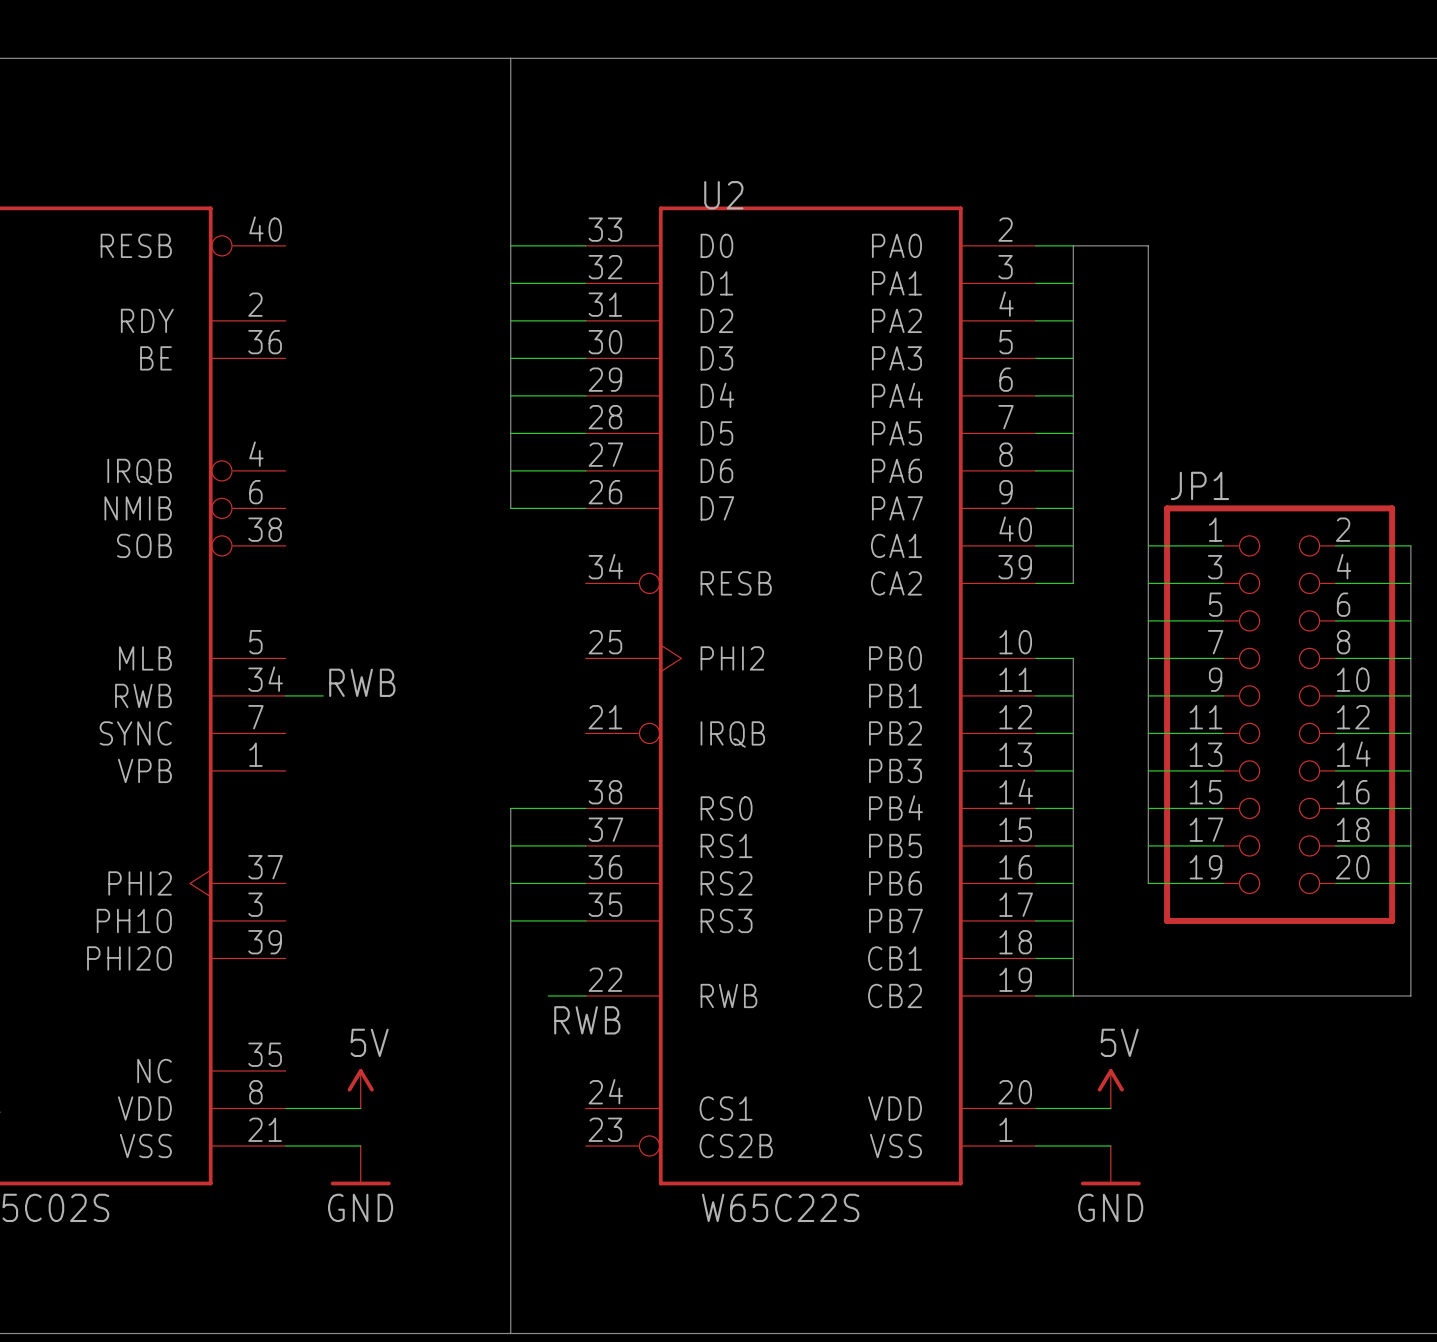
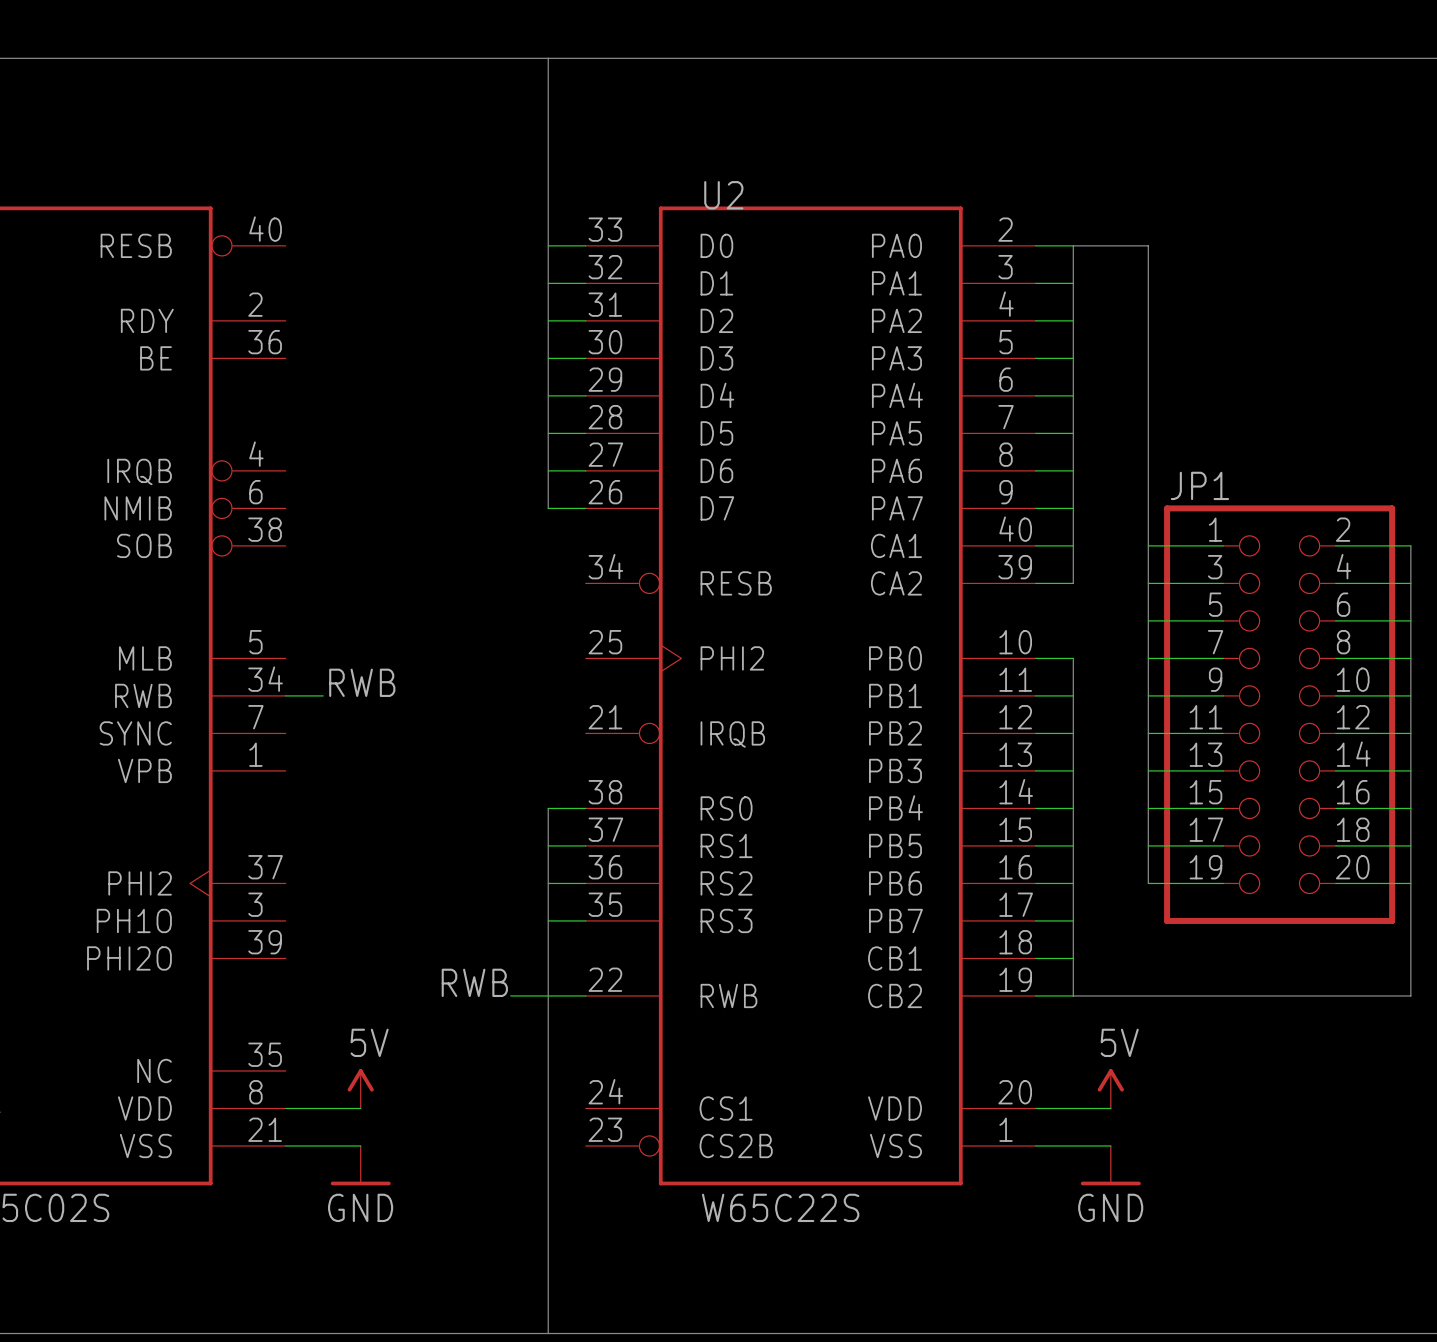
bus: (510, 58) (510, 508) -> (548, 58) (548, 508)
wire: (510, 245) (548, 245) -> none
wire: (510, 283) (548, 283) -> none
wire: (510, 320) (548, 320) -> none
wire: (510, 358) (548, 358) -> none
wire: (510, 395) (548, 395) -> none
wire: (510, 433) (548, 433) -> none
wire: (510, 470) (548, 470) -> none
wire: (510, 508) (548, 508) -> none
bus: (510, 808) (510, 1333) -> (548, 808) (548, 1333)
wire: (510, 808) (548, 808) -> none
wire: (510, 845) (548, 845) -> none
wire: (510, 883) (548, 883) -> none
wire: (510, 920) (548, 920) -> (510, 995) (548, 995)
label position: RWB (587, 1020) -> RWB (474, 982)

